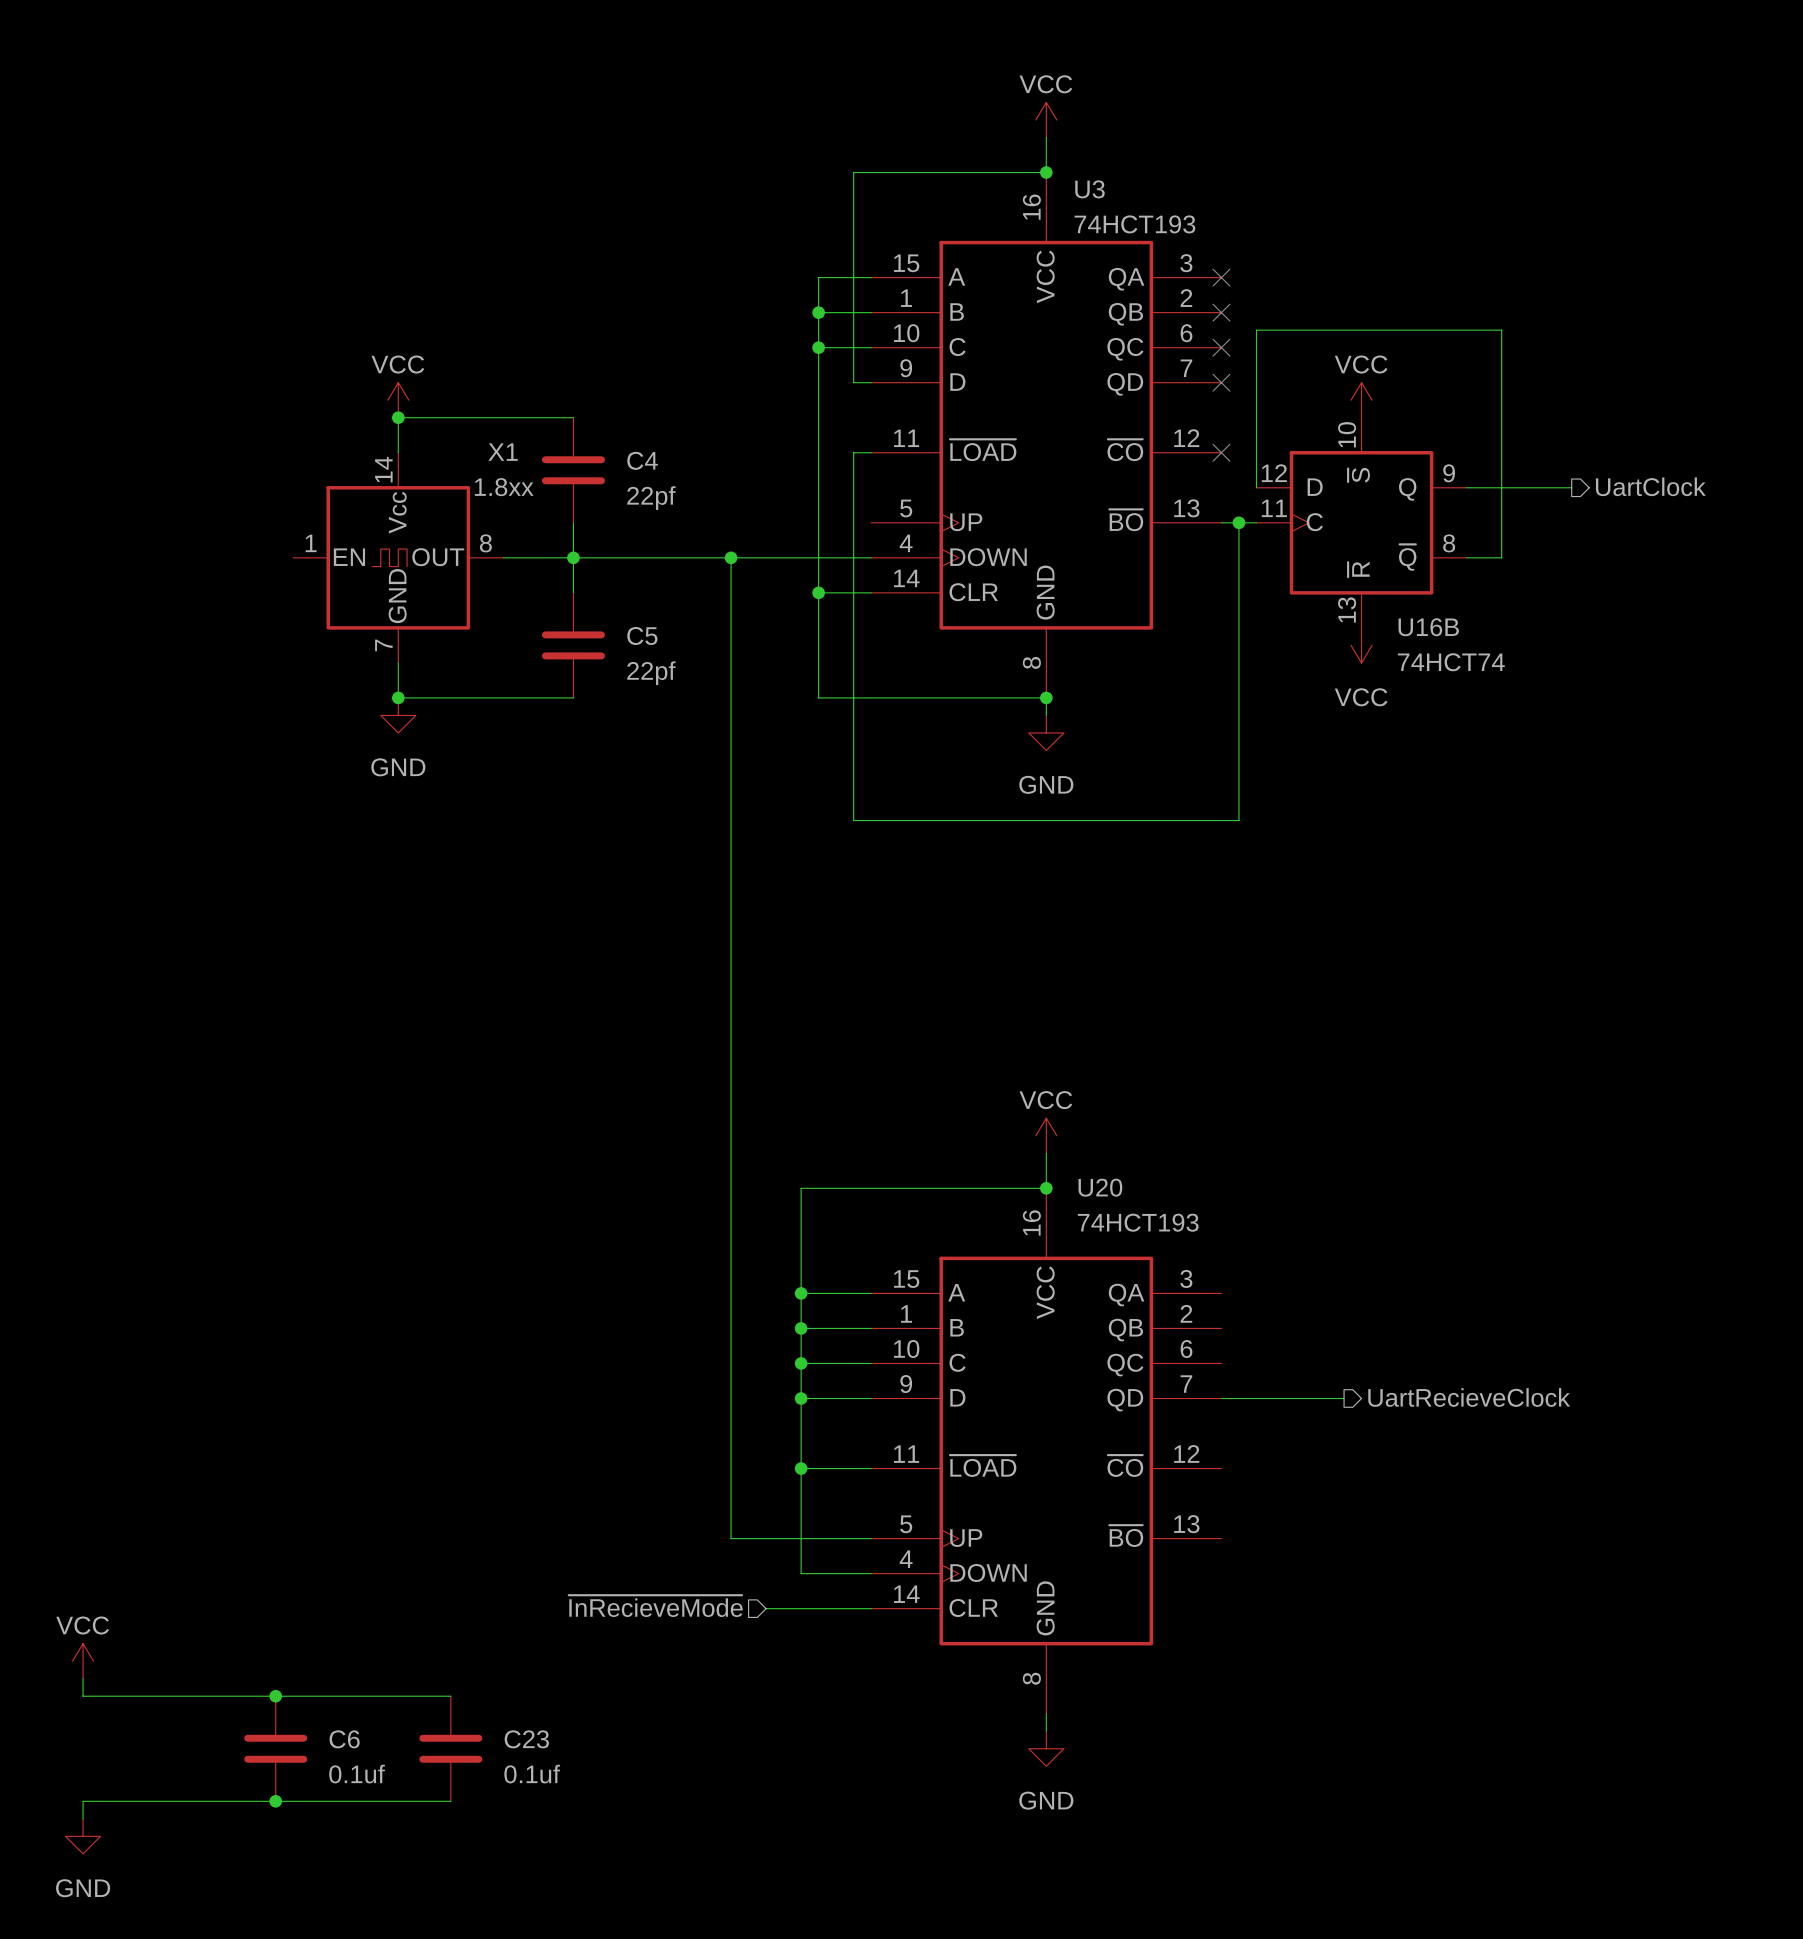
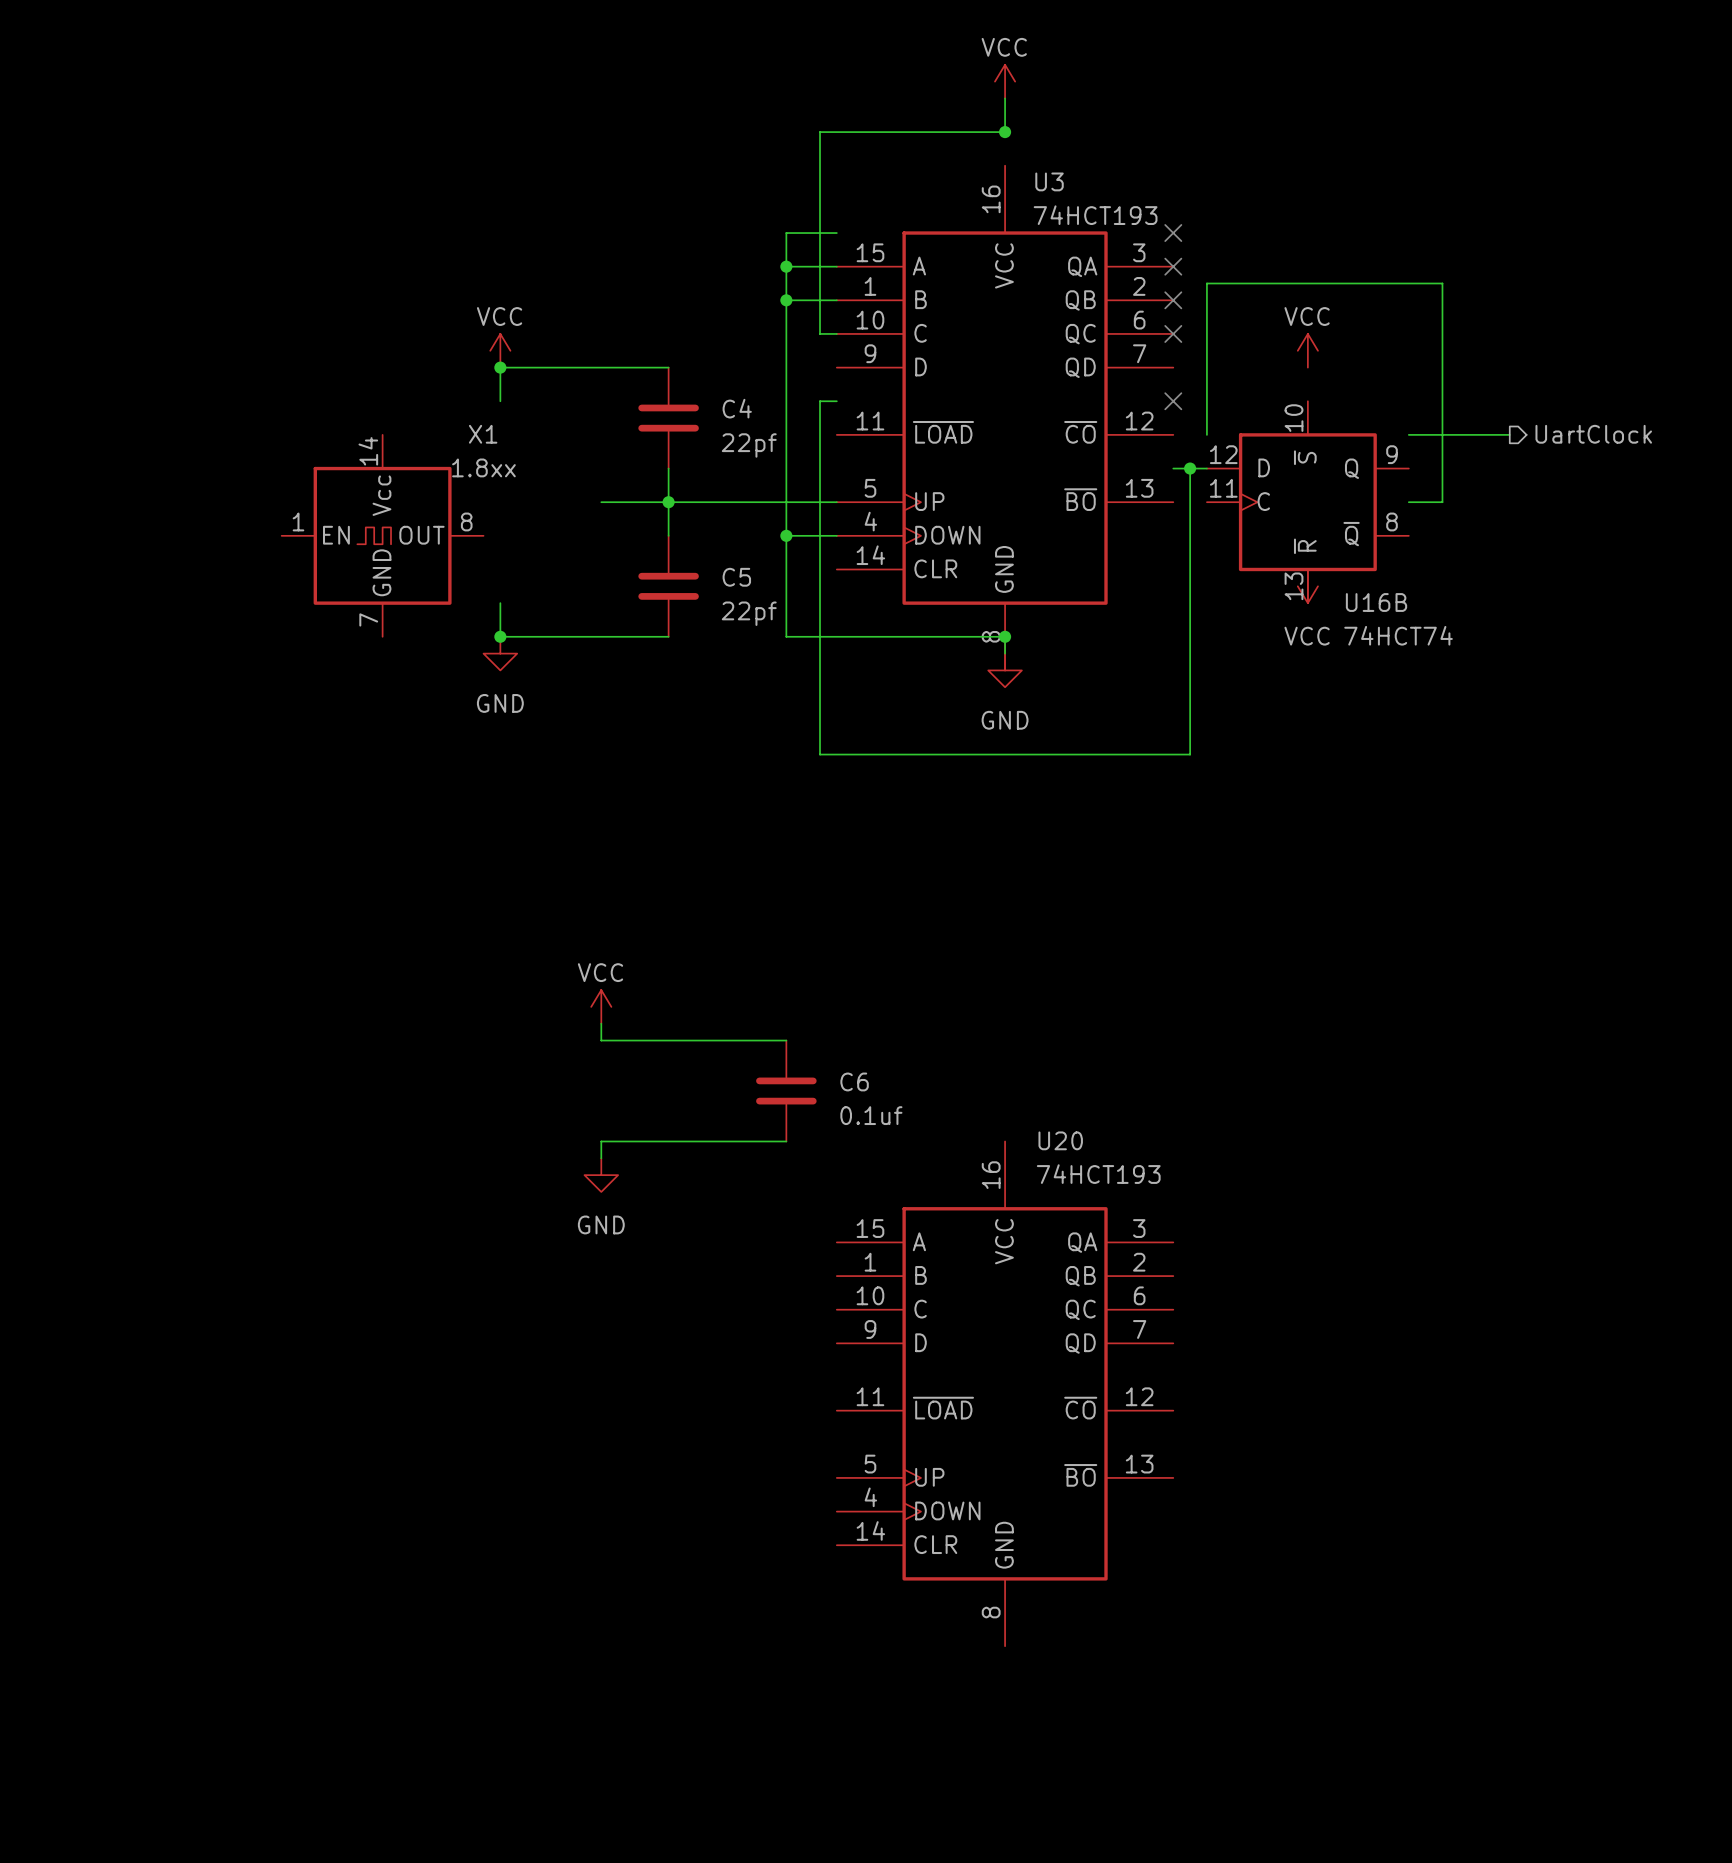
power symbol position: VCC (1046, 119) -> VCC (1005, 81)
wire: (1046, 137) (1046, 172) (853, 172) -> (1005, 98) (1005, 132) (820, 132) (820, 165)
junction position: (1046, 172) -> (1005, 132)
wire: none -> (836, 233) (786, 233) (786, 266)
no-connect mark: none -> (1173, 233)
wire: (1256, 330) (1501, 330) -> (1206, 317) (1206, 283) (1442, 283) (1442, 317)
wire: (818, 347) (853, 347) (853, 382) (871, 382) -> none
junction position: (818, 347) -> (786, 266)
junction: none -> (500, 367)
no-connect mark: (1221, 382) -> none
power symbol position: VCC (398, 400) -> VCC (500, 350)
power symbol position: VCC (1361, 400) -> VCC (1307, 350)
junction: (398, 417) -> none
wire: (573, 417) (398, 417) (398, 452) -> (668, 367) (500, 367) (500, 401)
no-connect mark: none -> (1173, 401)
wire: (853, 452) (871, 452) -> (820, 434) (820, 401) (836, 401)
no-connect mark: (1221, 452) -> none
wire: (1256, 452) (1256, 487) -> (1173, 468) (1206, 468)
C4 position: (573, 470) -> (668, 418)
hierarchical label position: UartClock (1650, 486) -> UartClock (1593, 434)
wire: none -> (1190, 468) (1190, 502)
wire: (1466, 487) (1571, 487) -> (1408, 434) (1509, 434)
wire: (573, 522) (573, 592) -> (668, 468) (668, 535)
wire: none -> (601, 502) (836, 502)
junction: none -> (668, 502)
wire: (1221, 522) (1256, 522) -> none
junction position: (1238, 522) -> (1190, 468)
wire: (1501, 522) (1501, 557) (1466, 557) -> (1442, 502) (1408, 502)
wire: (503, 557) (818, 557) -> none
junction: (573, 557) -> none
wire: (731, 557) (731, 1538) (871, 1538) -> none
junction: (731, 557) -> none
wire: (818, 592) (871, 592) -> none
junction position: (818, 592) -> (786, 535)
C5 position: (573, 645) -> (668, 586)
power symbol position: VCC (1361, 645) -> VCC (1307, 586)
wire: (398, 662) (398, 697) (573, 697) -> (500, 603) (500, 636) (668, 636)
junction: none -> (500, 636)
wire: (818, 662) (818, 697) (1046, 697) (1046, 715) -> (786, 636) (1005, 636) (1005, 653)
junction: (398, 697) -> none
junction position: (1046, 697) -> (1005, 636)
power symbol position: GND (398, 715) -> GND (500, 653)
power symbol position: GND (1046, 732) -> GND (1005, 670)
wire: (853, 785) (853, 820) (1238, 820) (1238, 785) -> (820, 754) (1190, 754)
power symbol: none -> VCC (601, 1006)
wire: none -> (601, 1023) (601, 1040) (786, 1040)
power symbol: VCC (1046, 1135) -> none
wire: (1046, 1153) (1046, 1188) (818, 1188) -> none
wire: (801, 1188) (801, 1573) (871, 1573) -> (769, 1141) (601, 1141) (601, 1158)
junction: (1046, 1188) -> none
power symbol: none -> GND (601, 1175)
wire: (801, 1293) (871, 1293) -> none
junction: (801, 1293) -> none
wire: (801, 1328) (871, 1328) -> none
junction: (801, 1328) -> none
wire: (801, 1363) (871, 1363) -> none
junction: (801, 1363) -> none
hierarchical label: UartRecieveClock (1469, 1397) -> none
wire: (801, 1398) (871, 1398) -> none
junction: (801, 1398) -> none
wire: (1221, 1398) (1344, 1398) -> none
wire: (801, 1468) (871, 1468) -> none
junction: (801, 1468) -> none
hierarchical label: ~{InRecieveMode} (655, 1606) -> none
wire: (766, 1608) (871, 1608) -> none
power symbol: VCC (83, 1661) -> none
wire: (83, 1678) (83, 1696) (450, 1696) -> none
junction: (275, 1696) -> none
wire: (1046, 1713) (1046, 1731) -> none
C6 position: (275, 1748) -> (786, 1091)
C23: 0.1uf (450, 1748) -> none
power symbol: GND (1046, 1748) -> none
junction: (275, 1801) -> none
wire: (450, 1801) (83, 1801) (83, 1818) -> none
power symbol: GND (83, 1836) -> none

